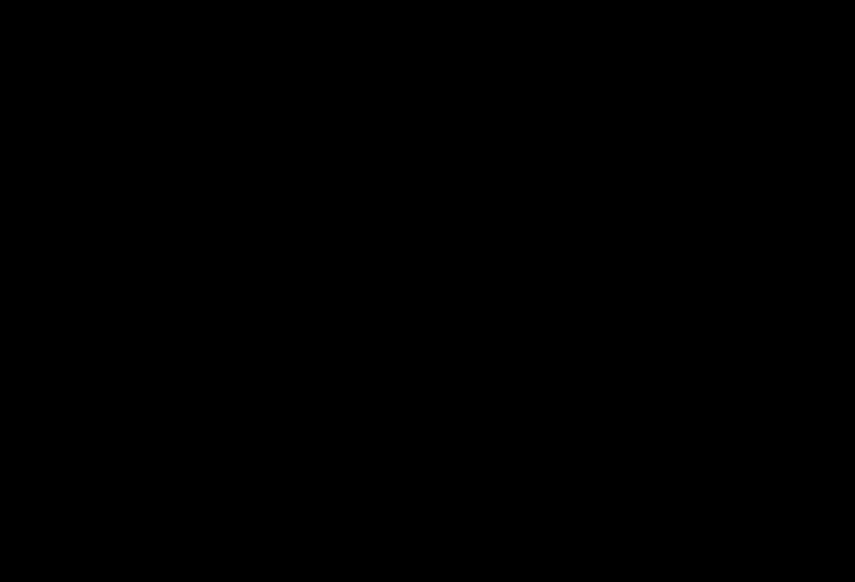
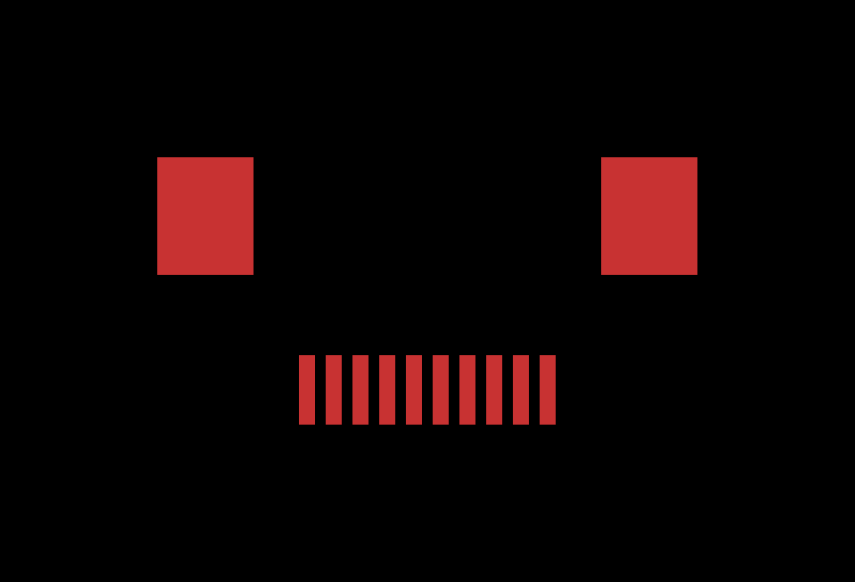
part: none -> (427, 290)

